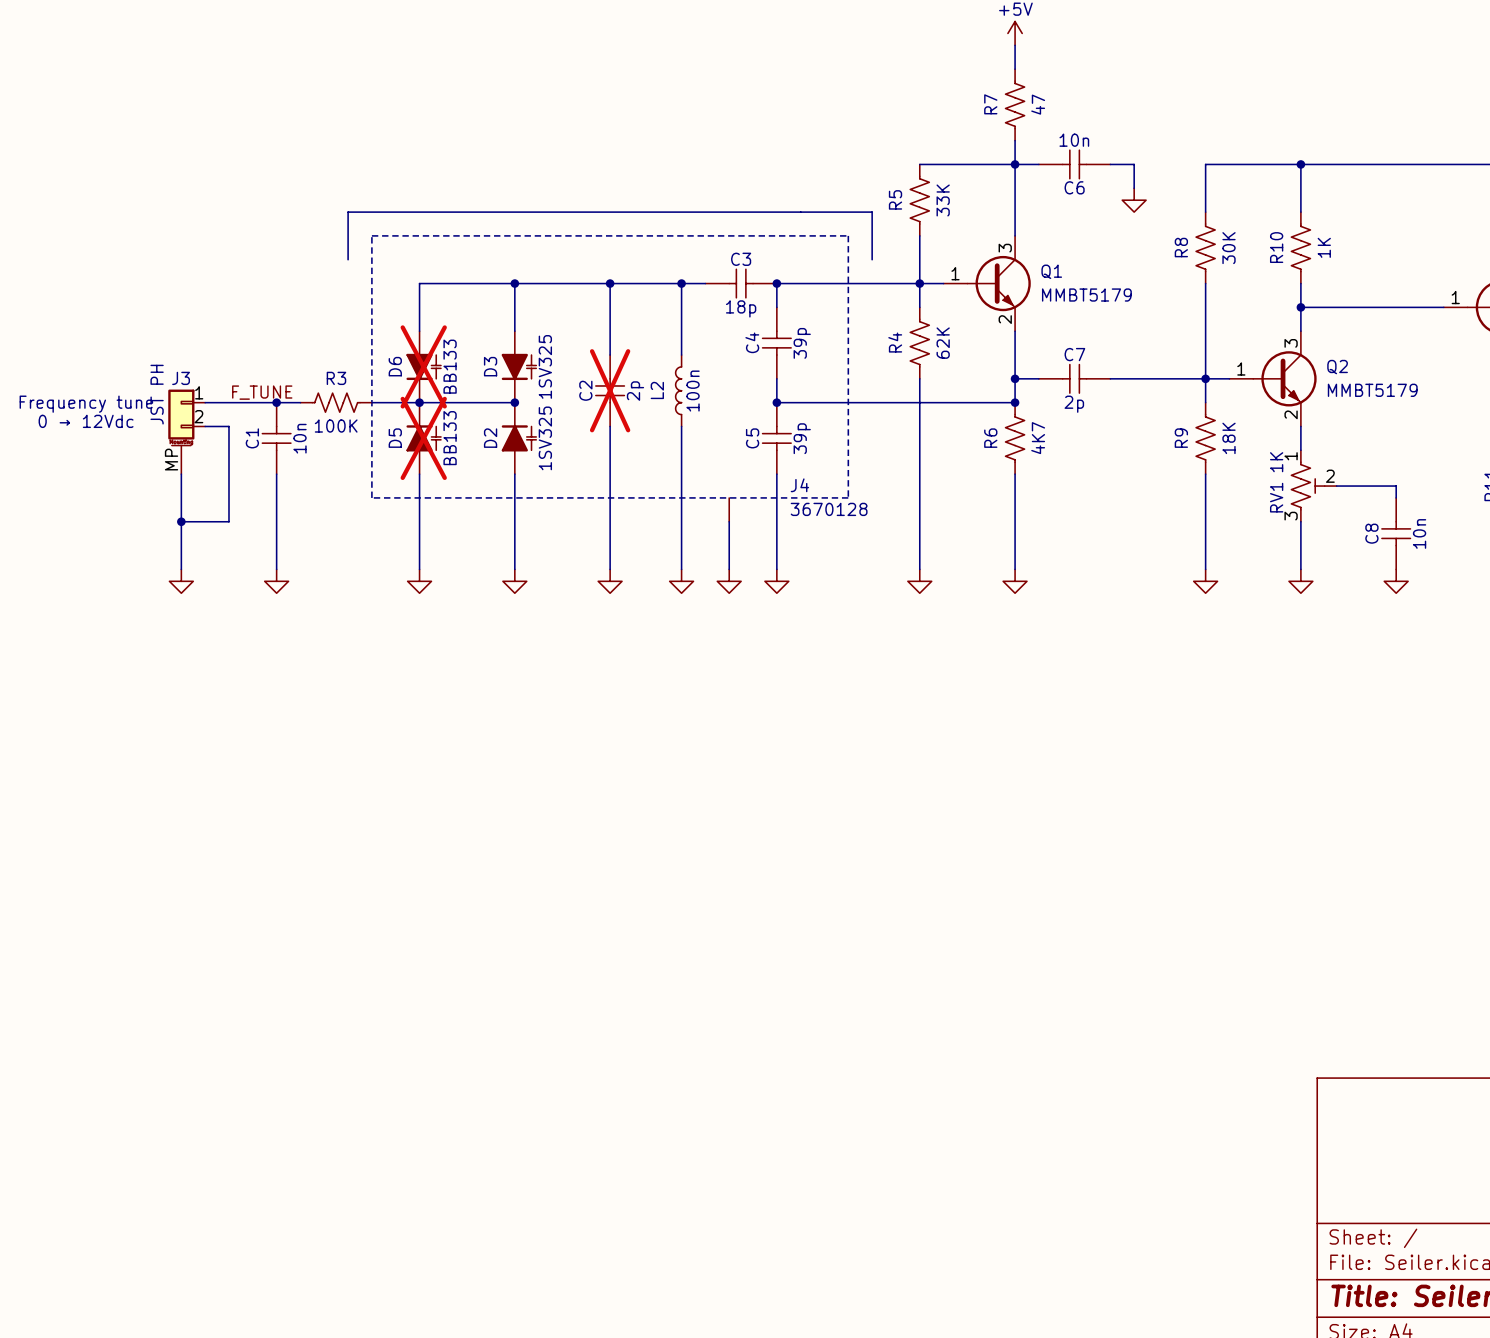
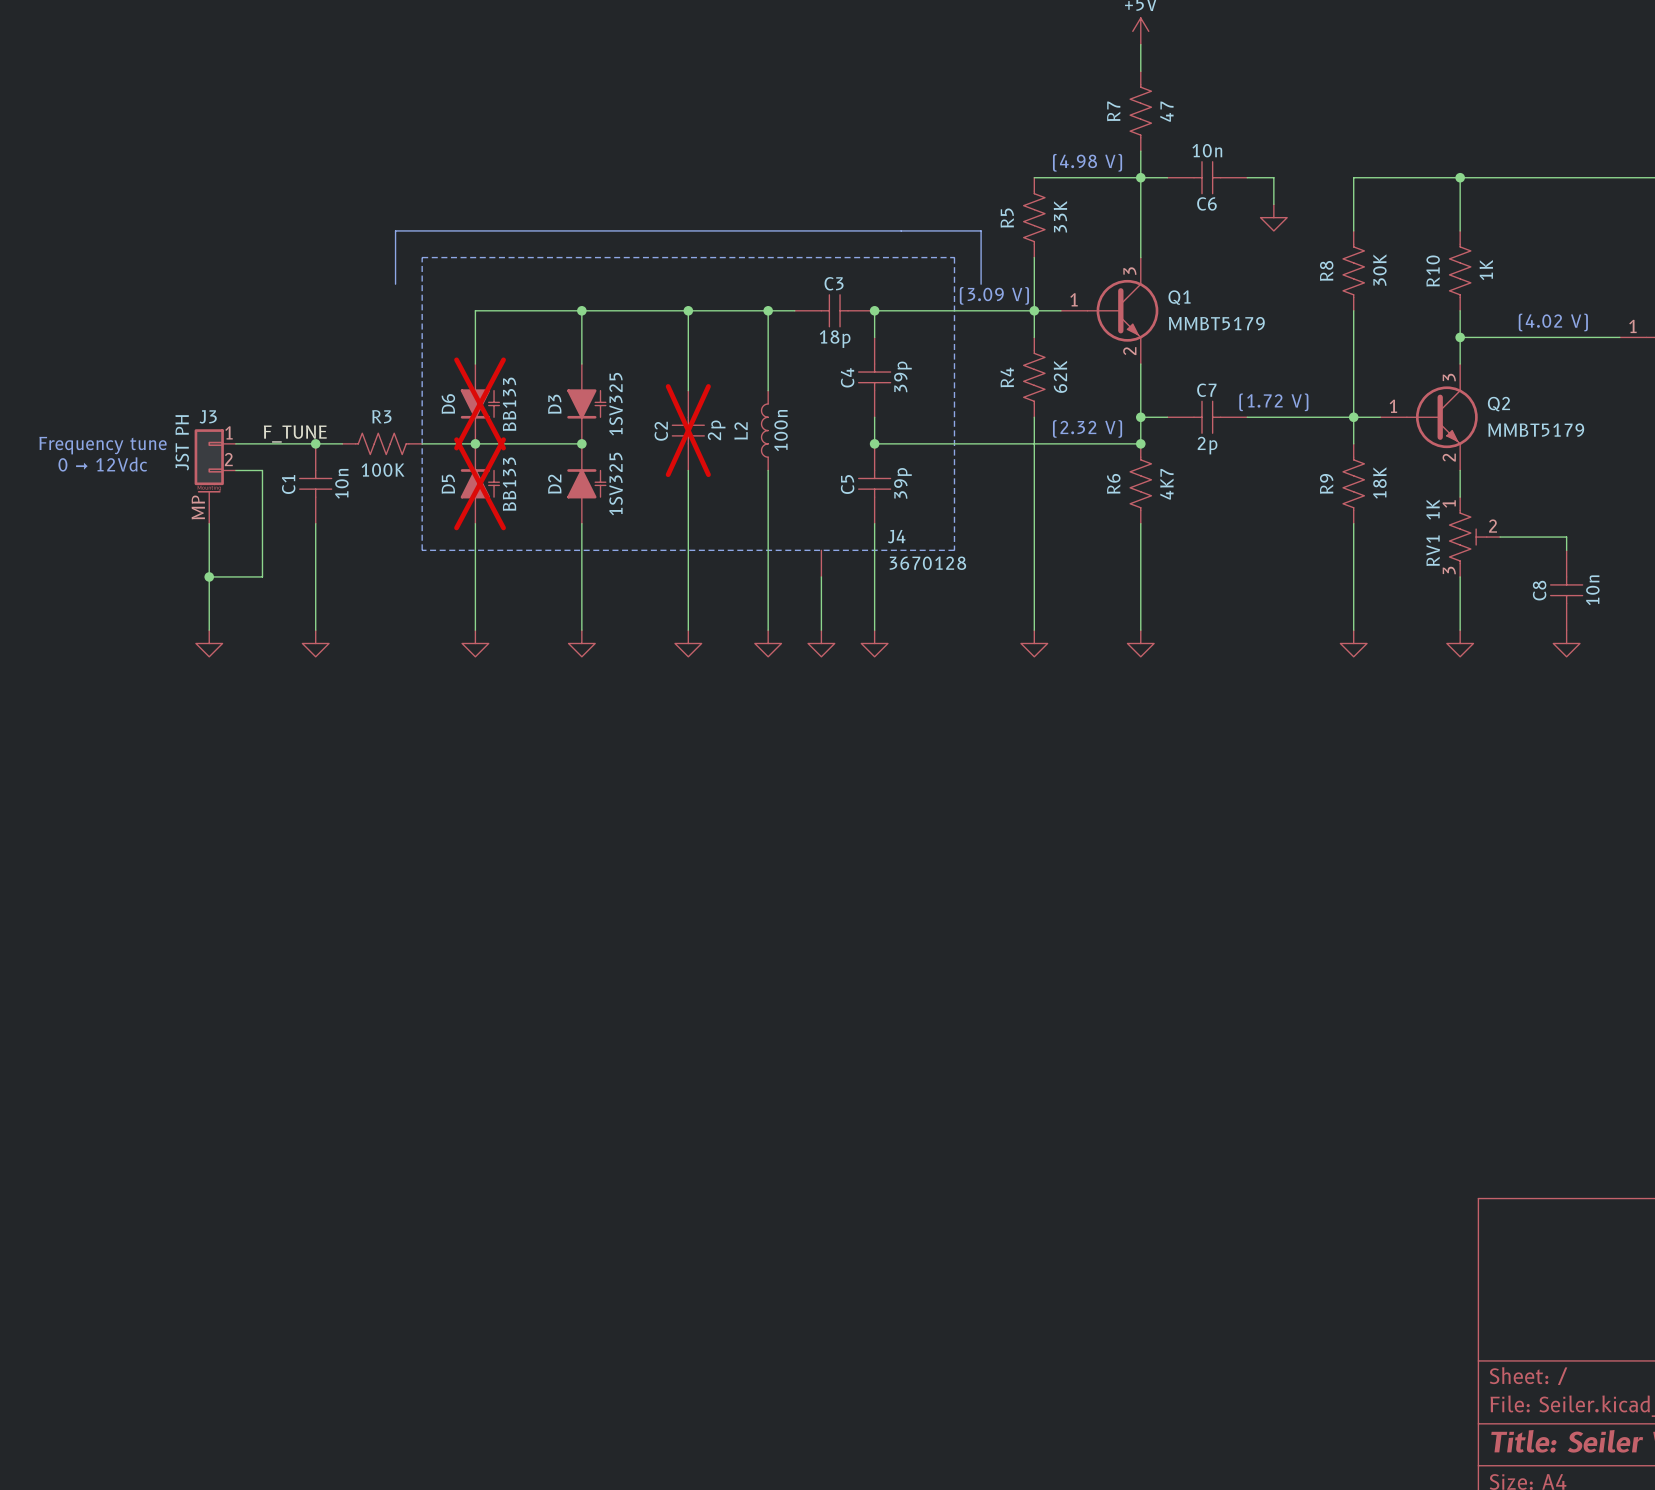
text: none -> (4.98 V) (1087, 162)
text: none -> (3.09 V) (994, 295)
text: none -> (4.02 V) (1553, 322)
text: none -> (1.72 V) (1273, 402)
text: none -> (2.32 V) (1087, 428)

